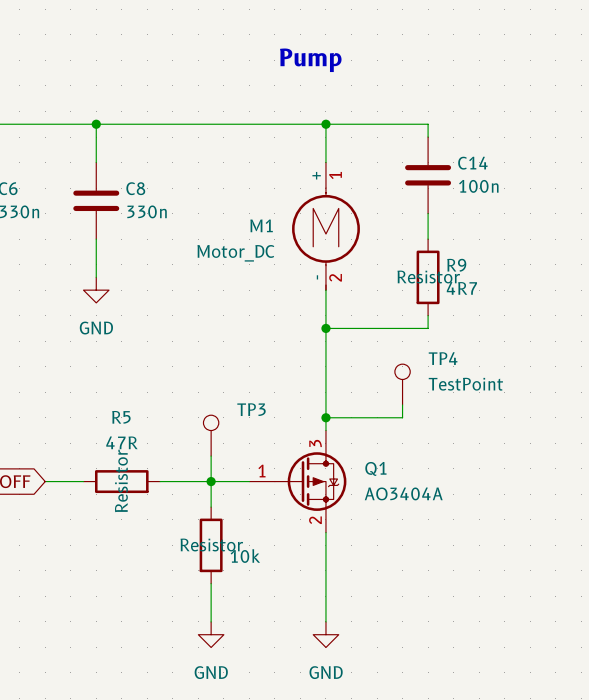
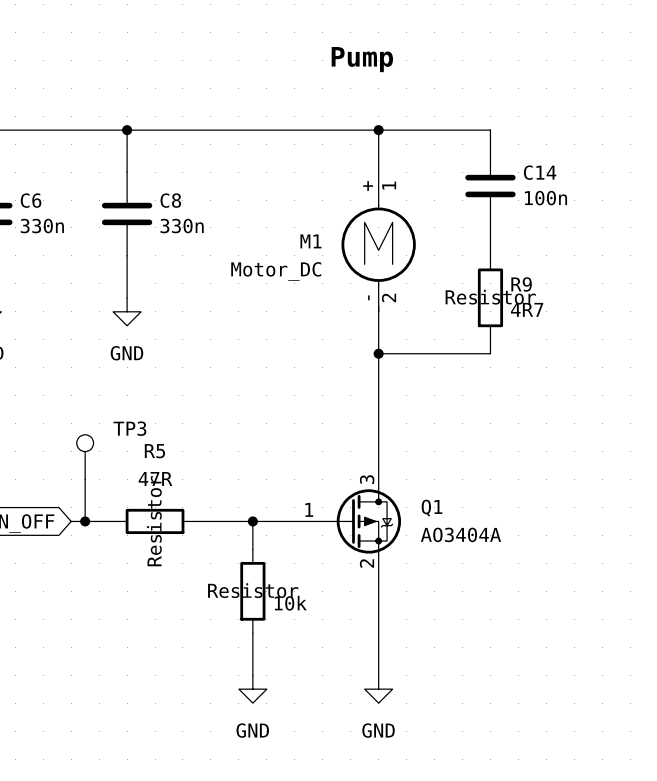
TP4: TestPoint (402, 384) -> none
wire: (402, 405) (402, 417) (325, 417) -> none
junction: (325, 417) -> none
TP3 position: (211, 435) -> (85, 457)
wire: none -> (85, 479) (85, 521)
wire: (211, 456) (211, 481) -> none
junction: none -> (85, 521)

